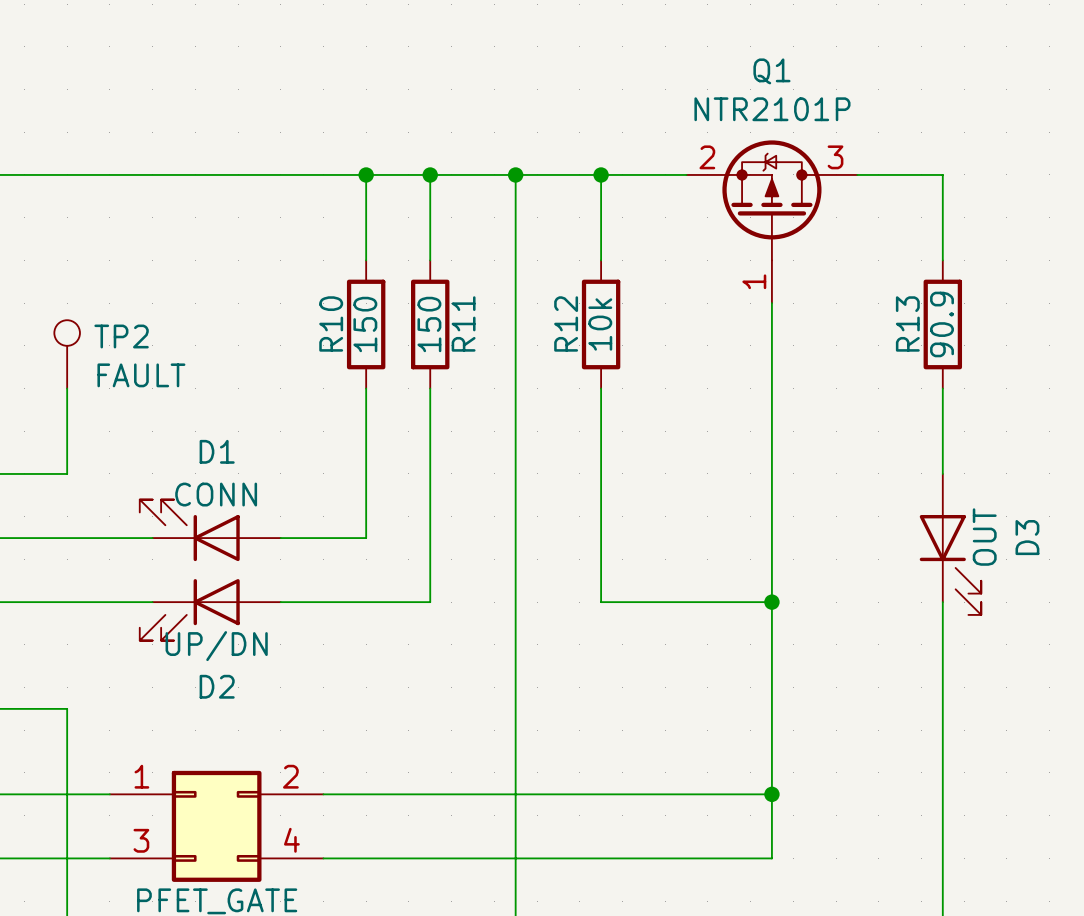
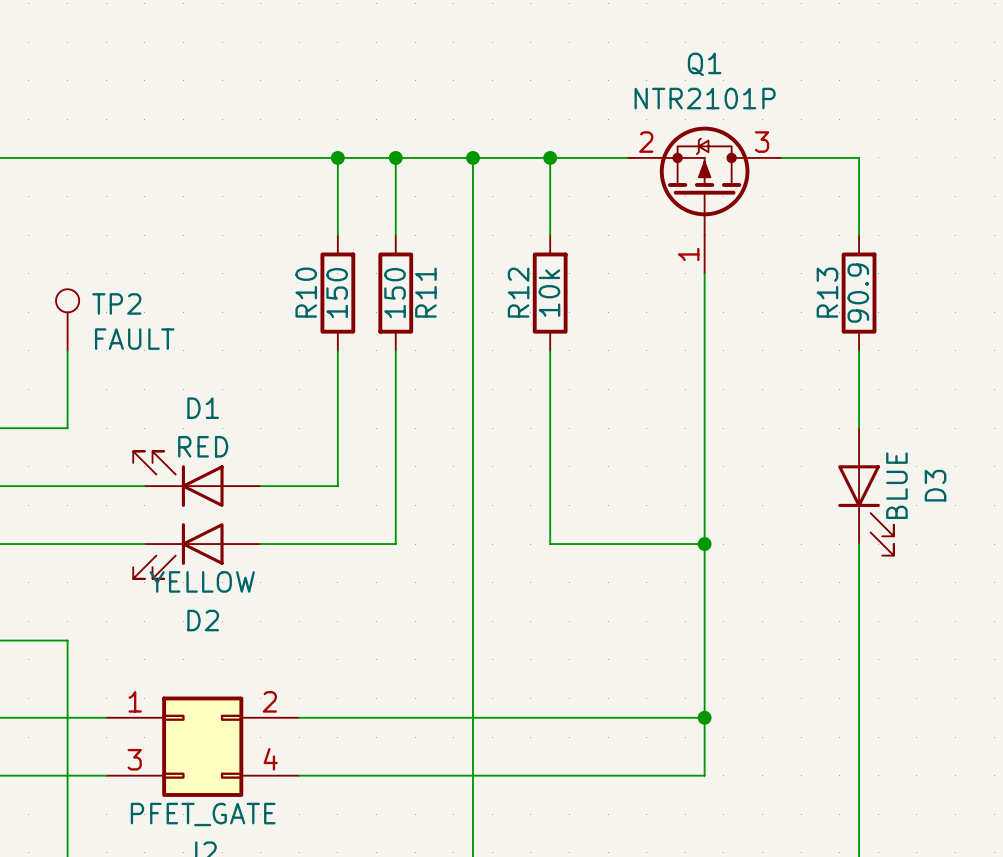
D1 value: CONN (216, 494) -> RED (203, 446)
D3 value: OUT (984, 537) -> BLUE (896, 485)
D2 value: UP/DN (216, 646) -> YELLOW (202, 581)

